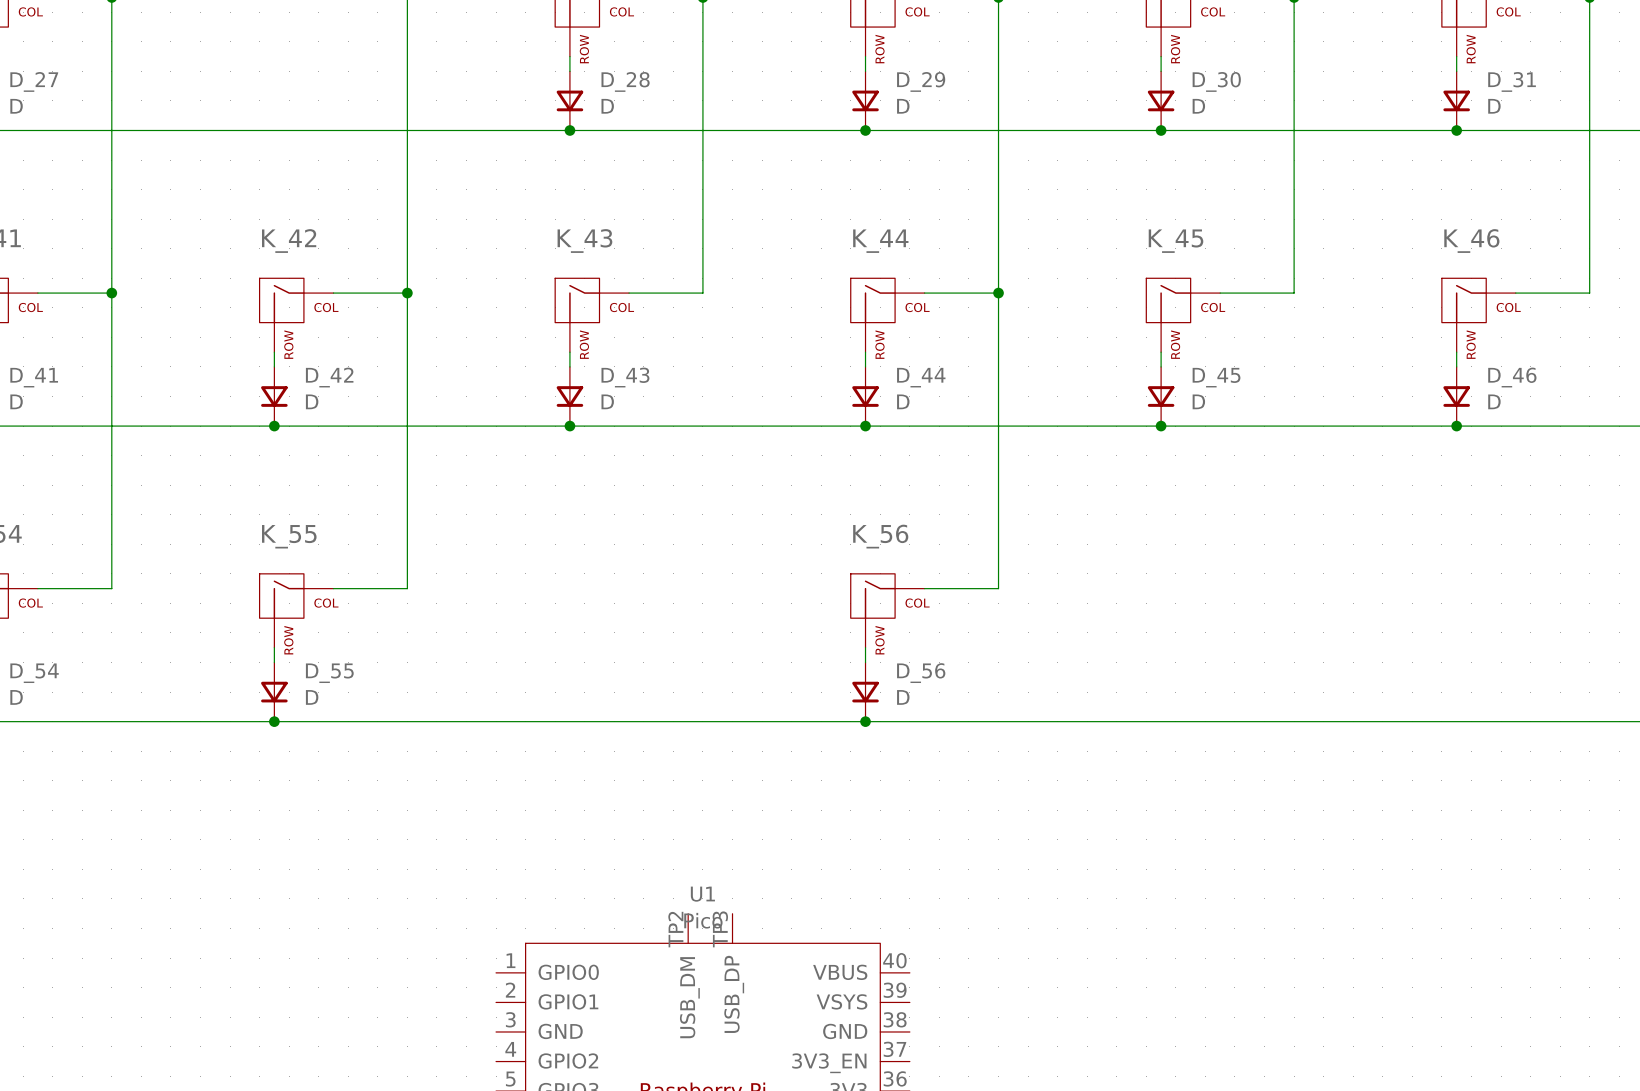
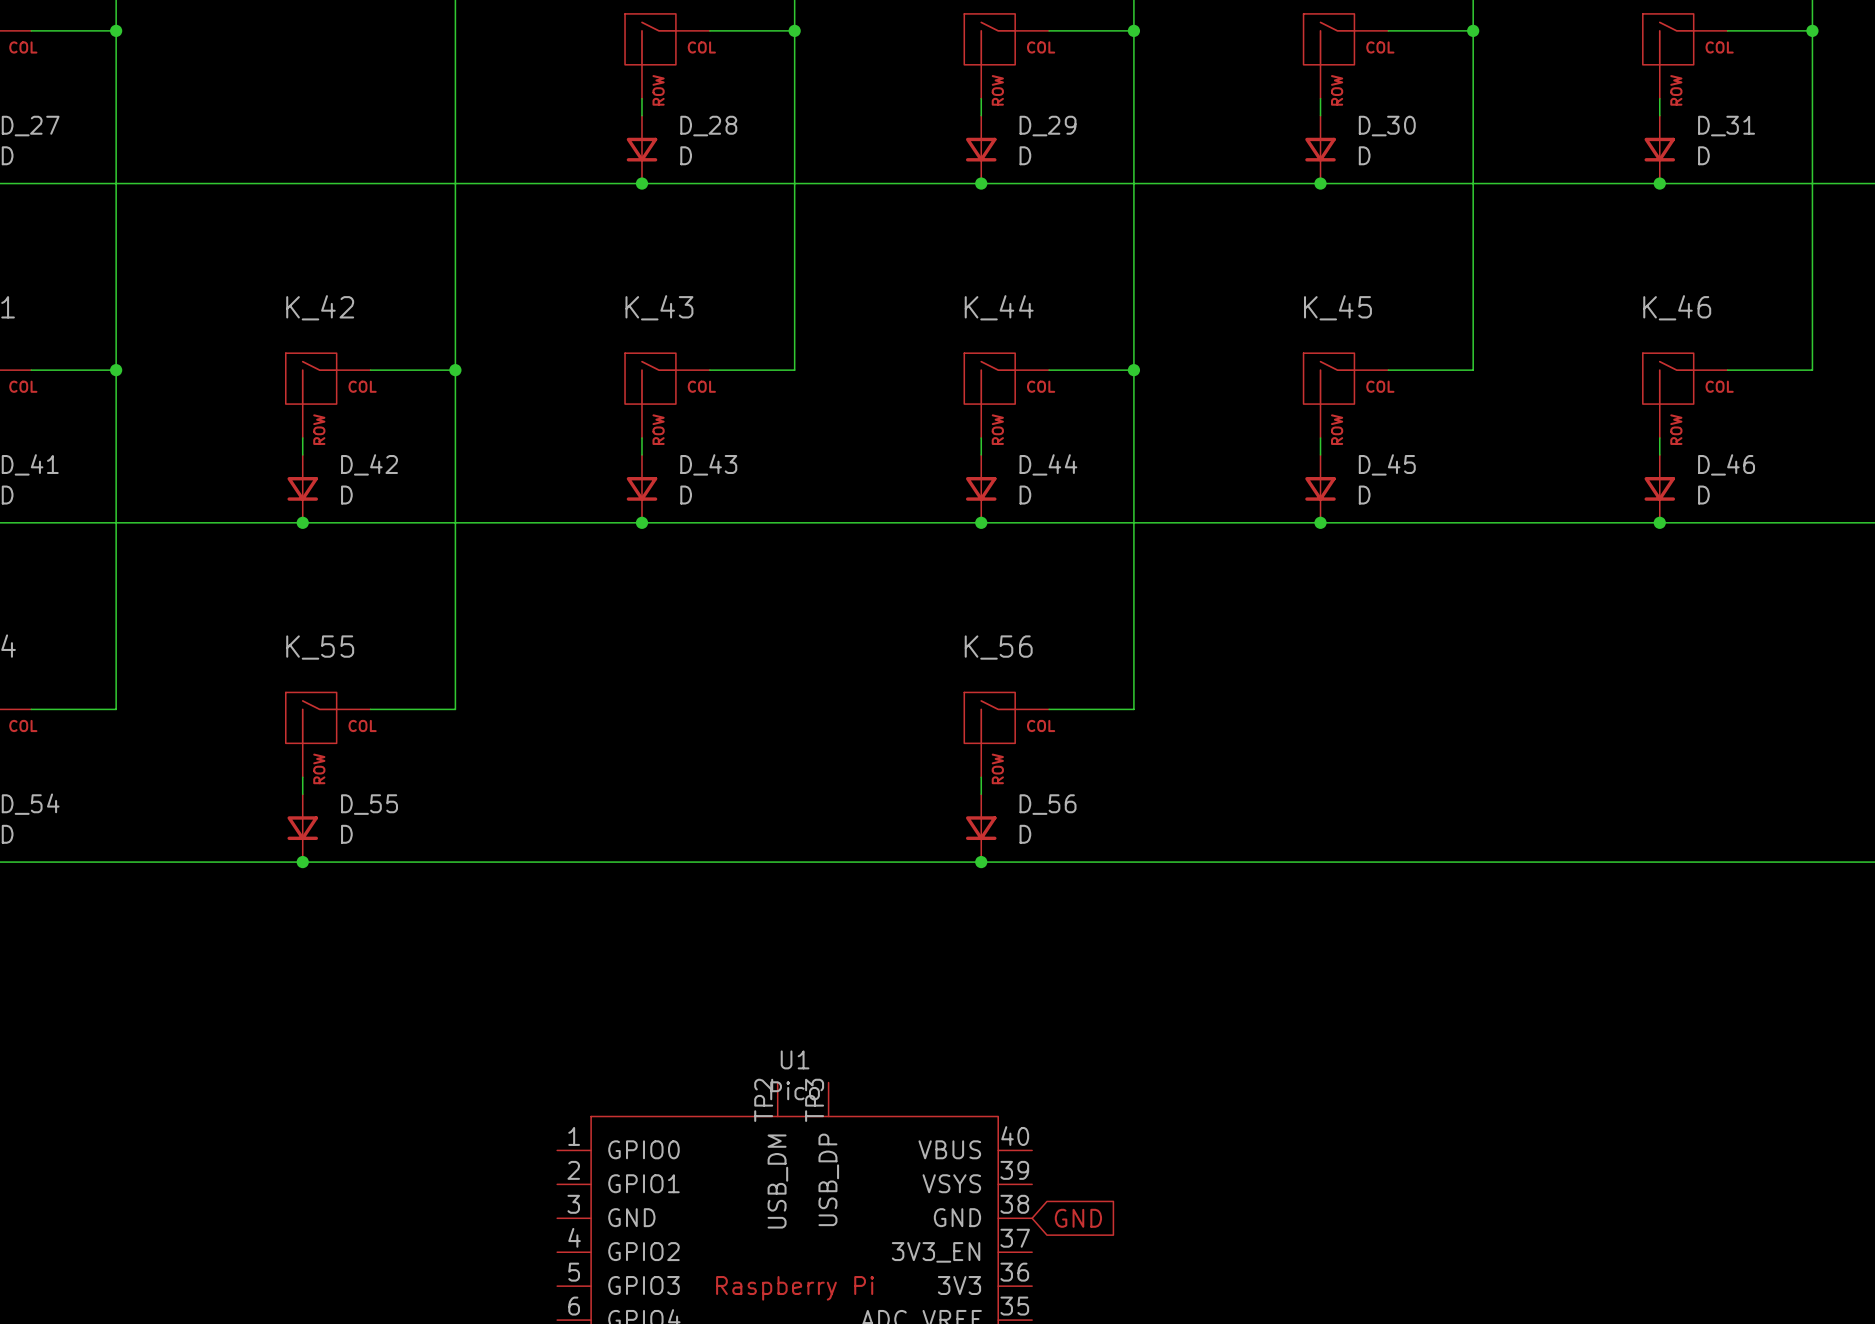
global label: none -> GND (1078, 1218)

